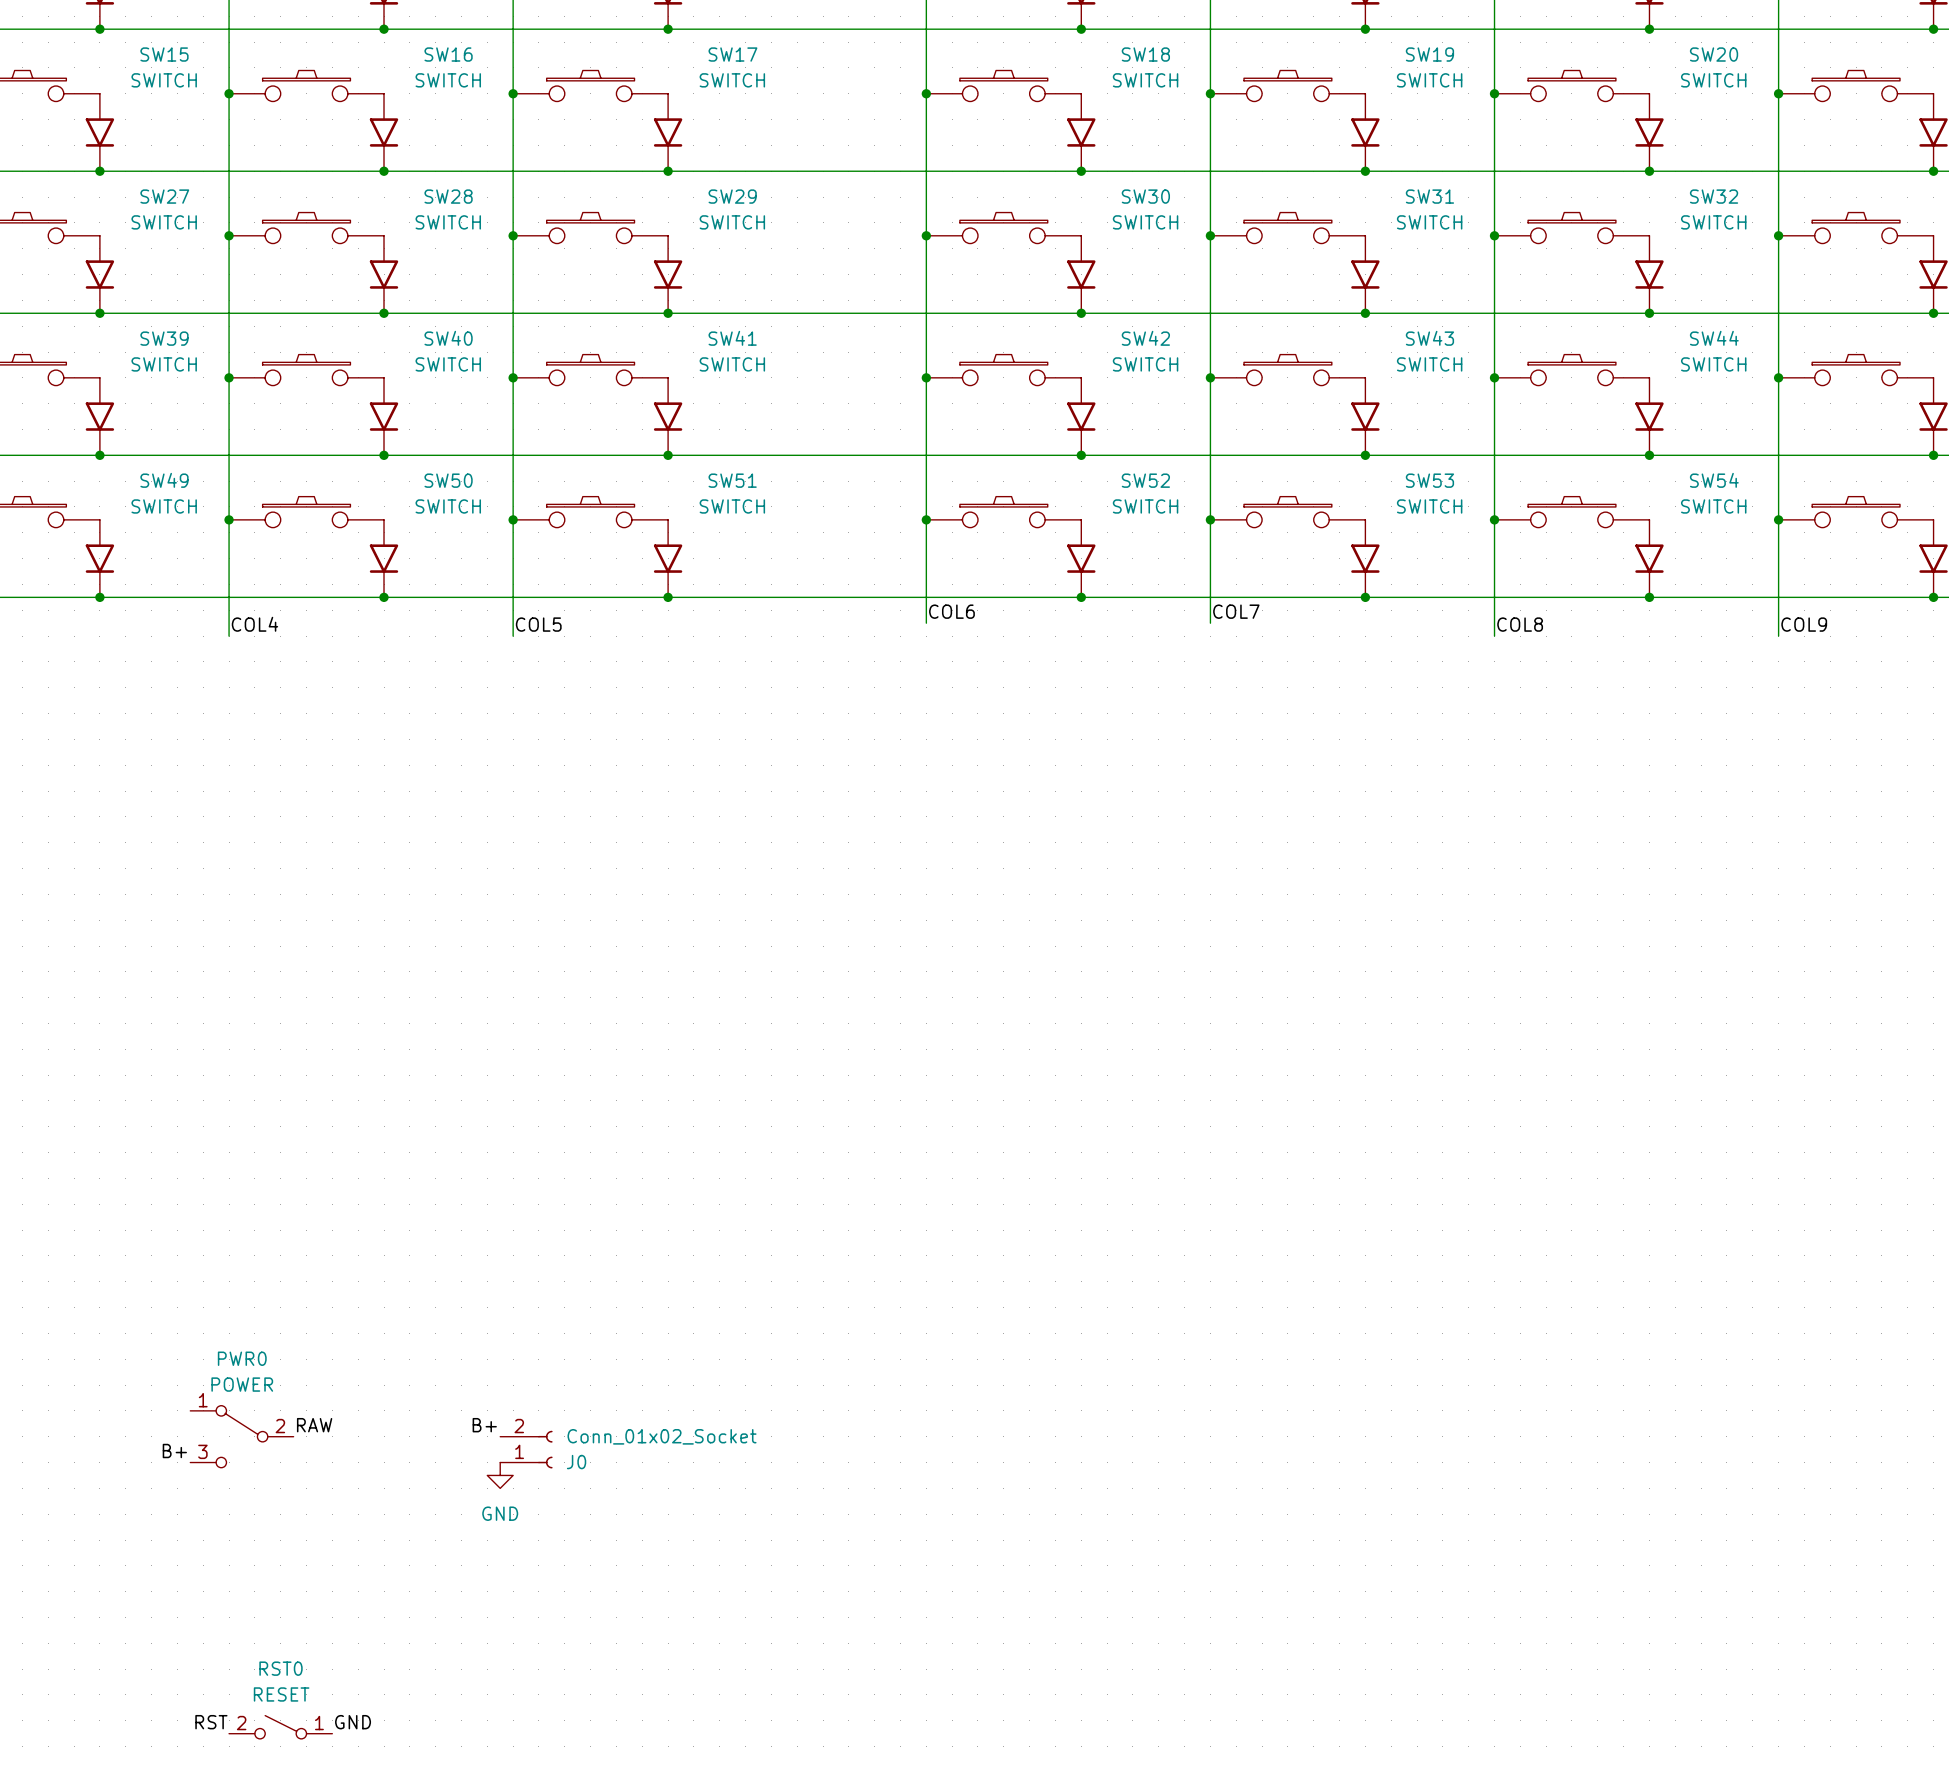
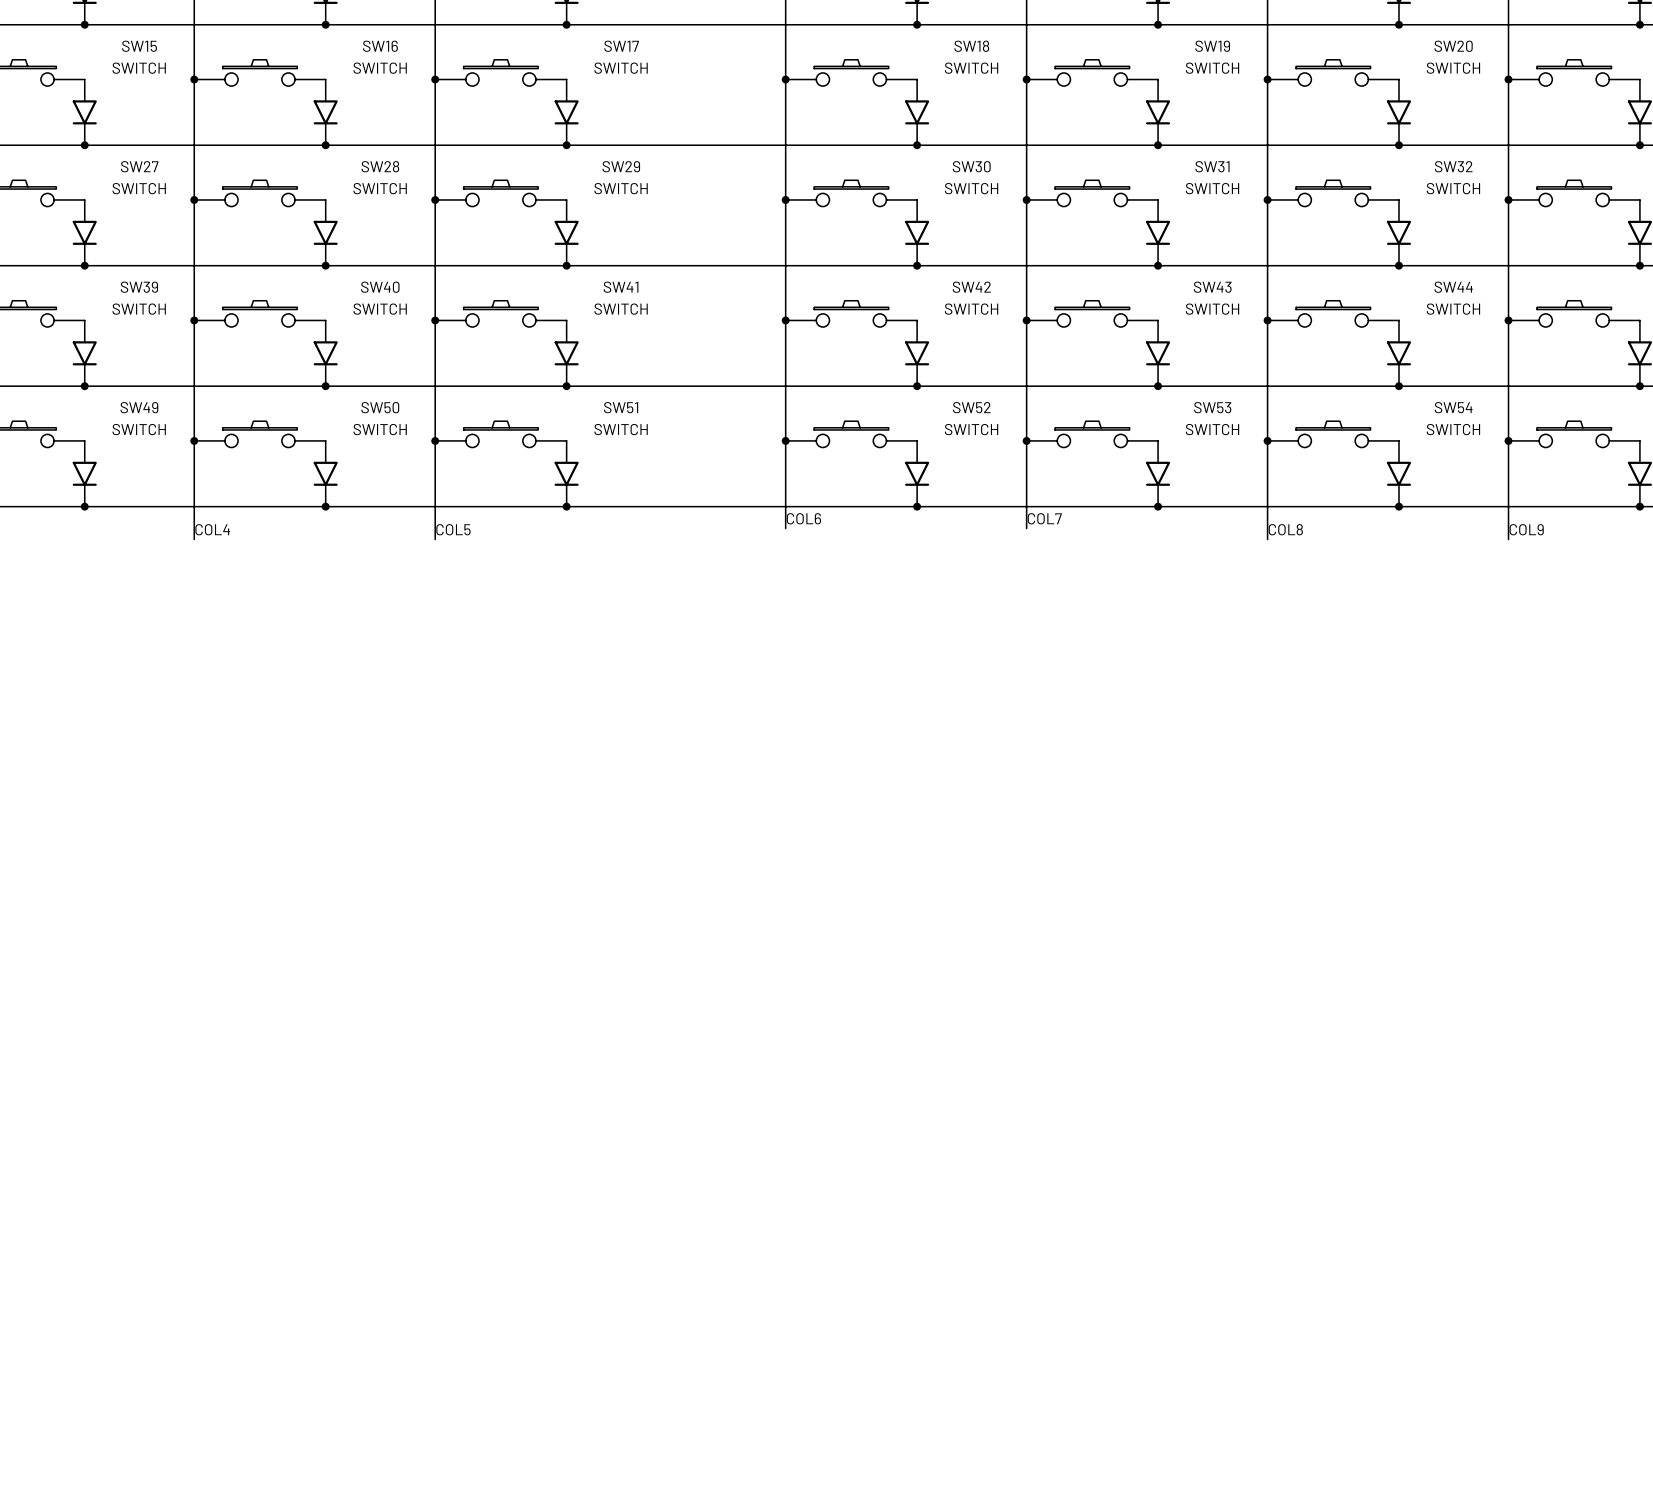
label: RAW (314, 1425) -> none
label: B+ (484, 1425) -> none
PWR0: POWER (241, 1436) -> none
J0: Conn_01x02_Socket (526, 1449) -> none
label: B+ (174, 1451) -> none
power symbol: GND (500, 1475) -> none
label: RST (211, 1722) -> none
label: GND (353, 1722) -> none
RST0: RESET (280, 1727) -> none

